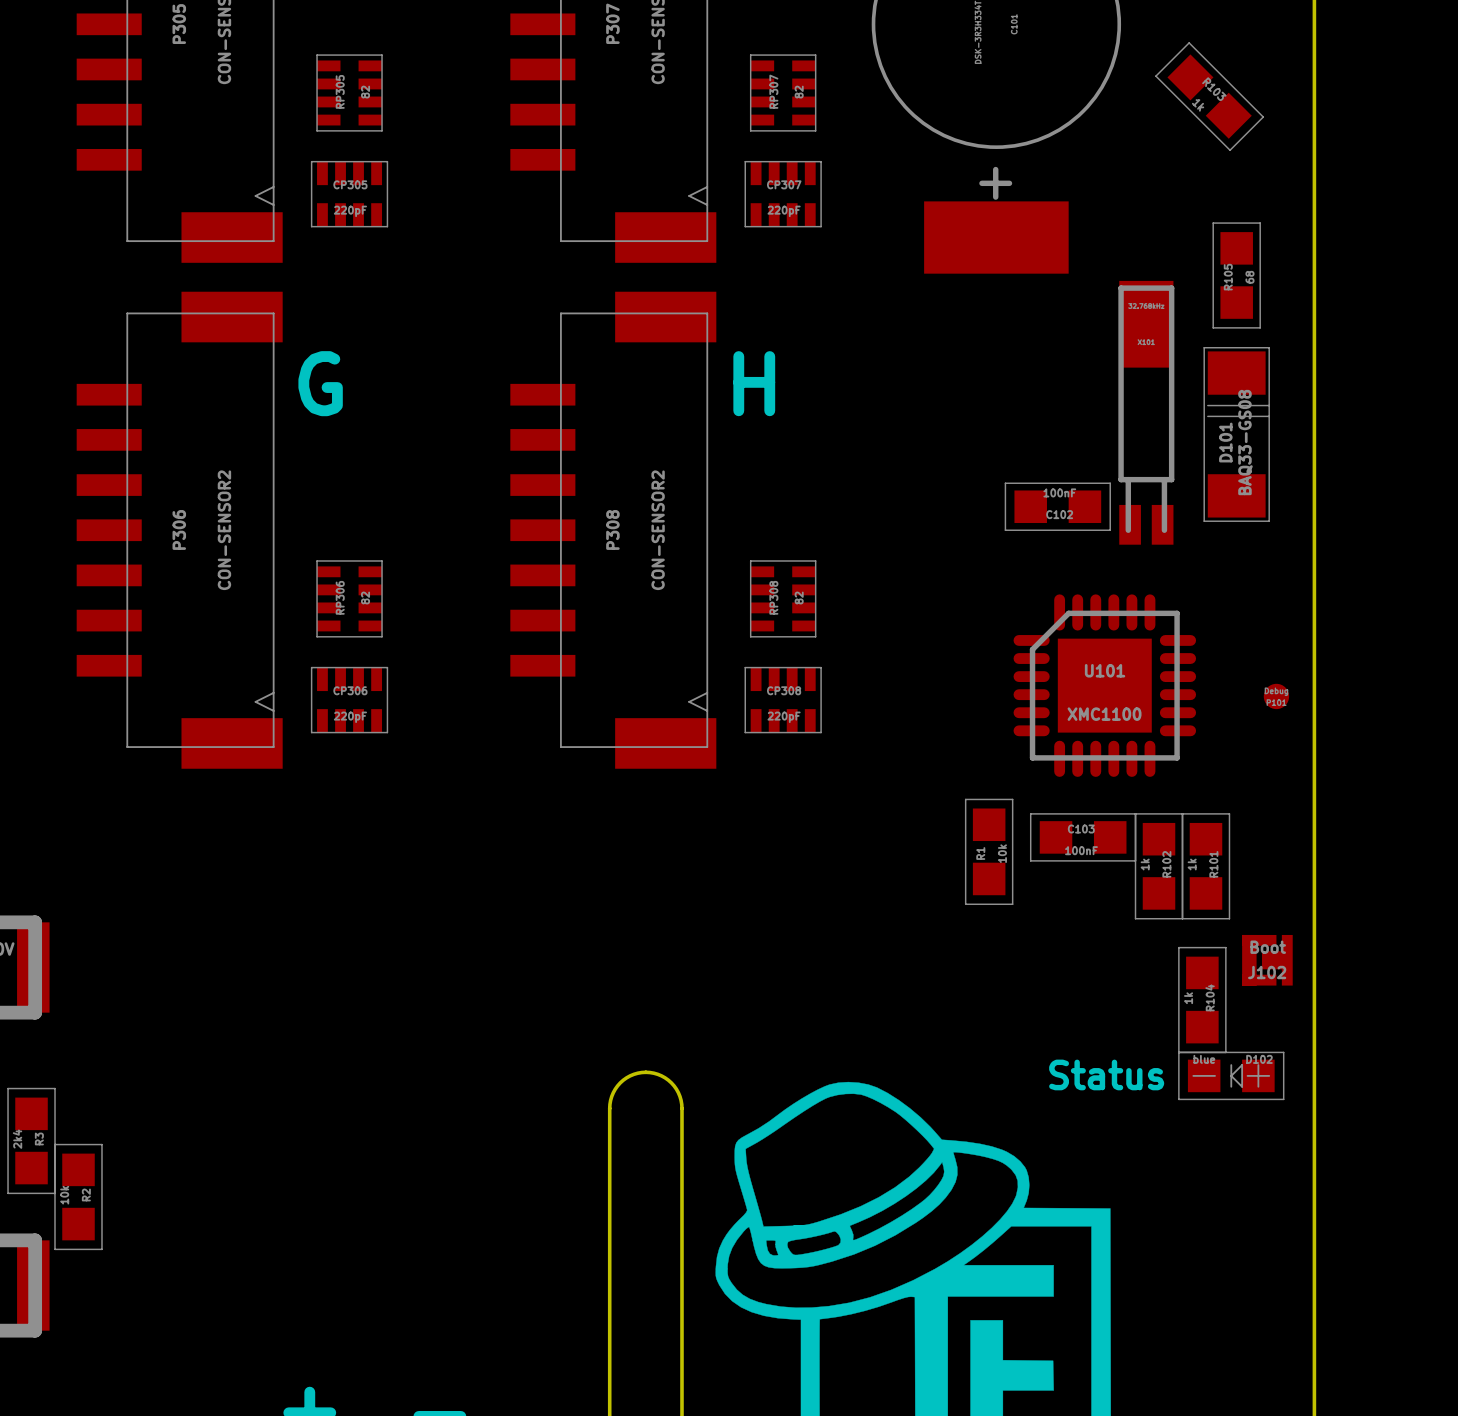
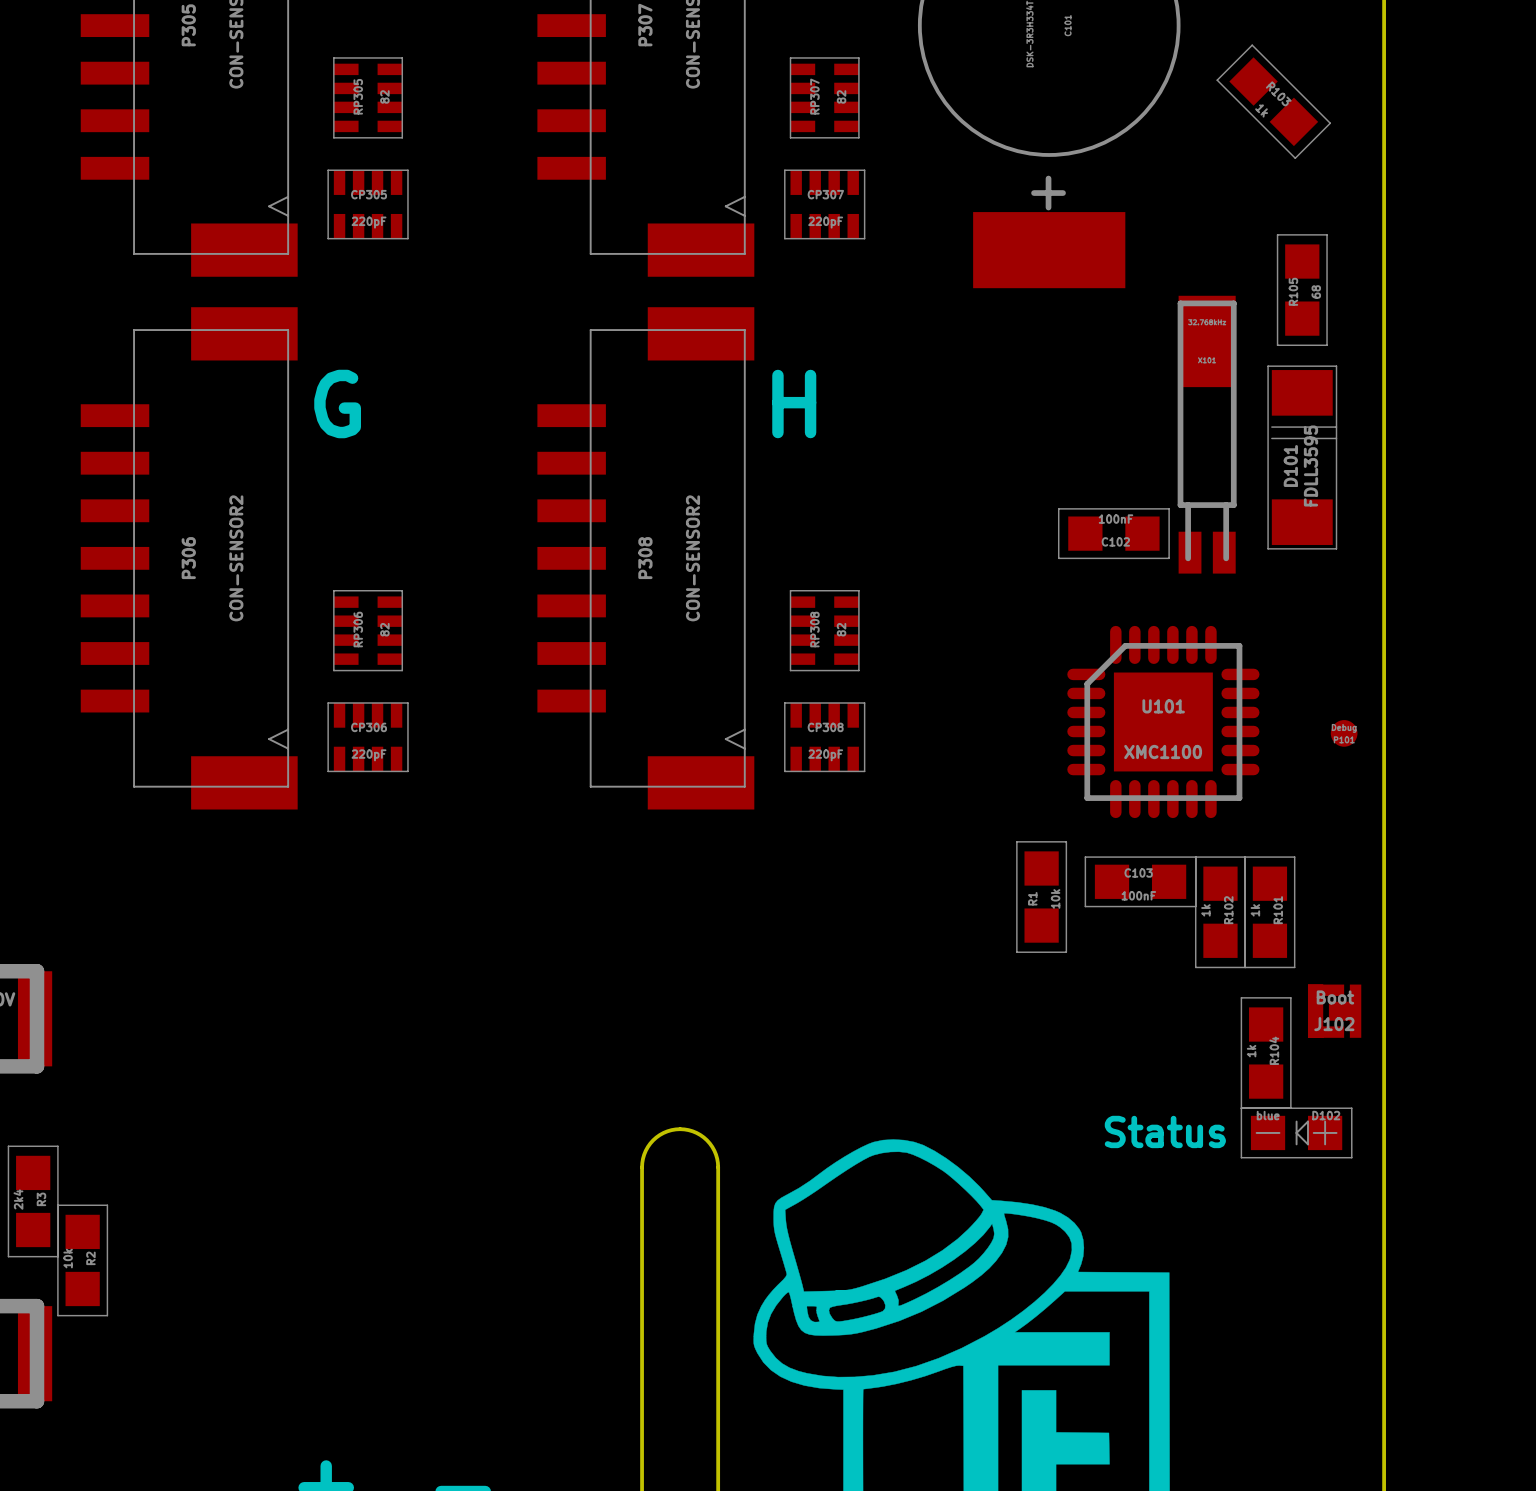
D101 value: BAQ33-GS08 (1245, 442) -> FDLL3595 (1310, 465)

